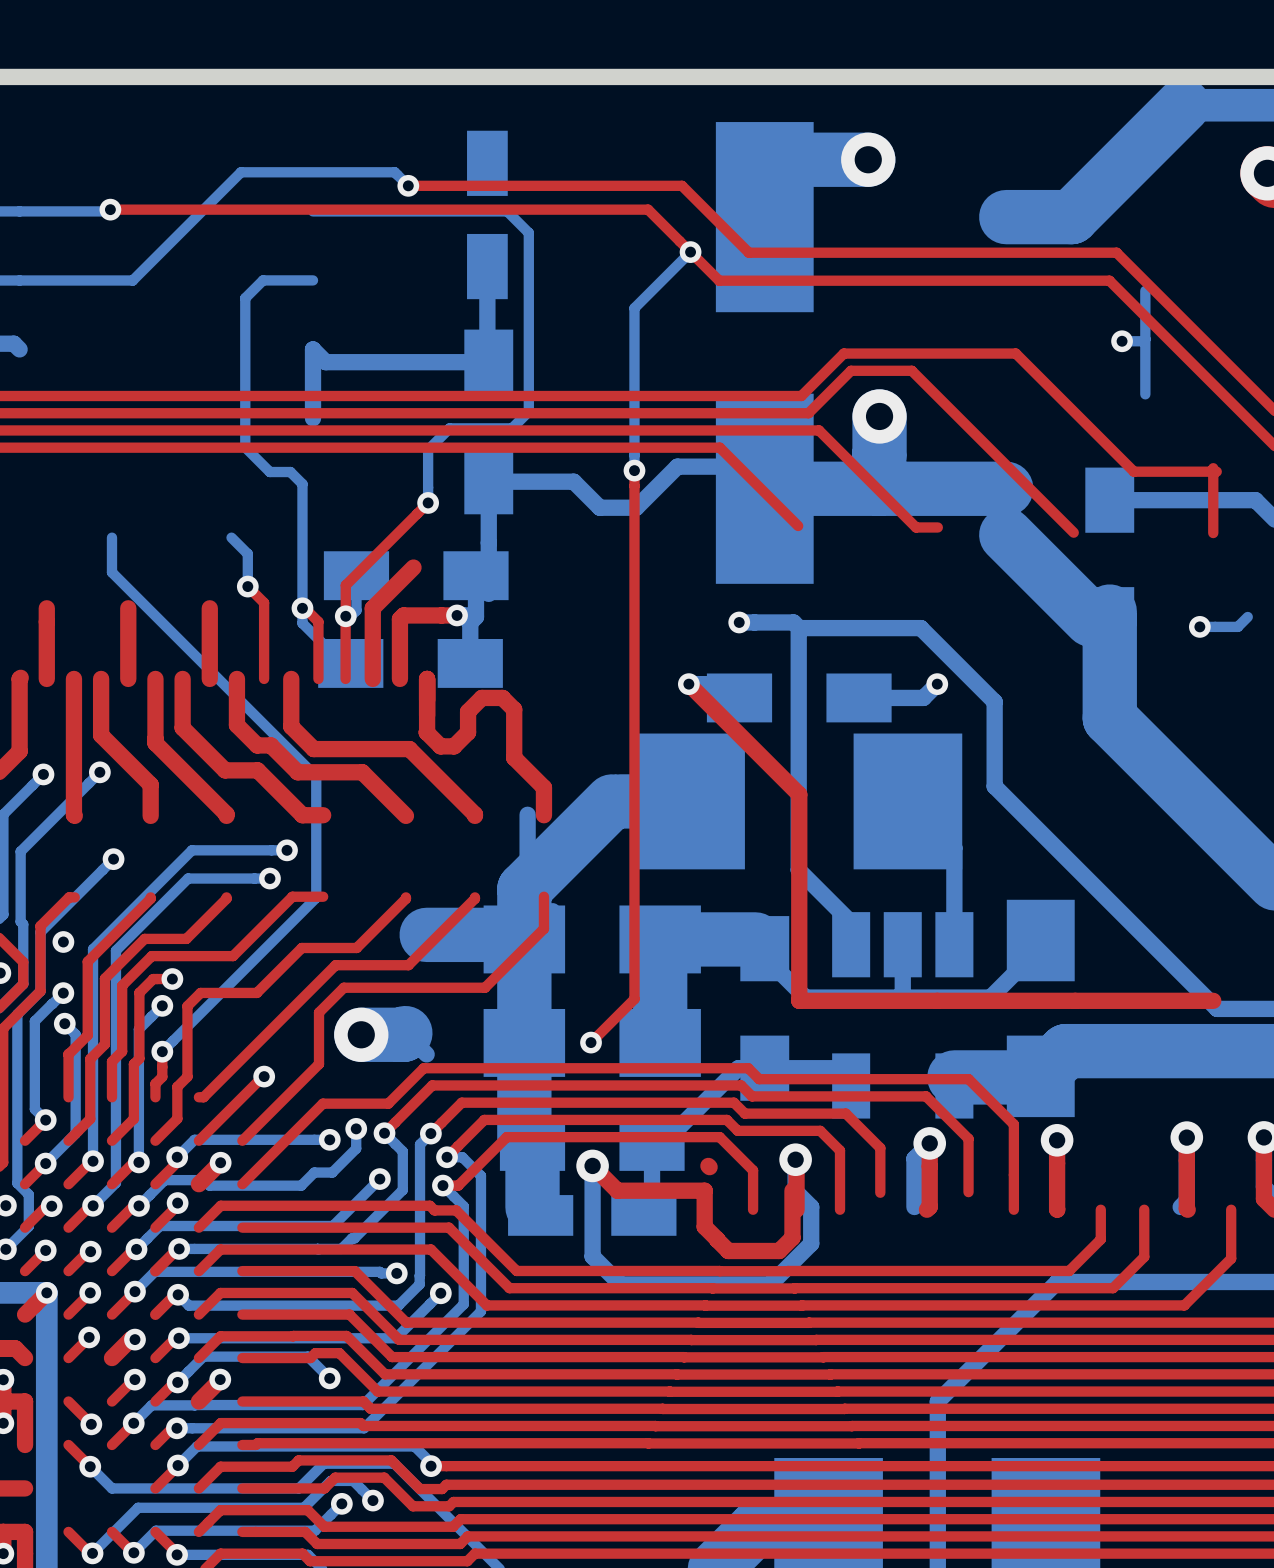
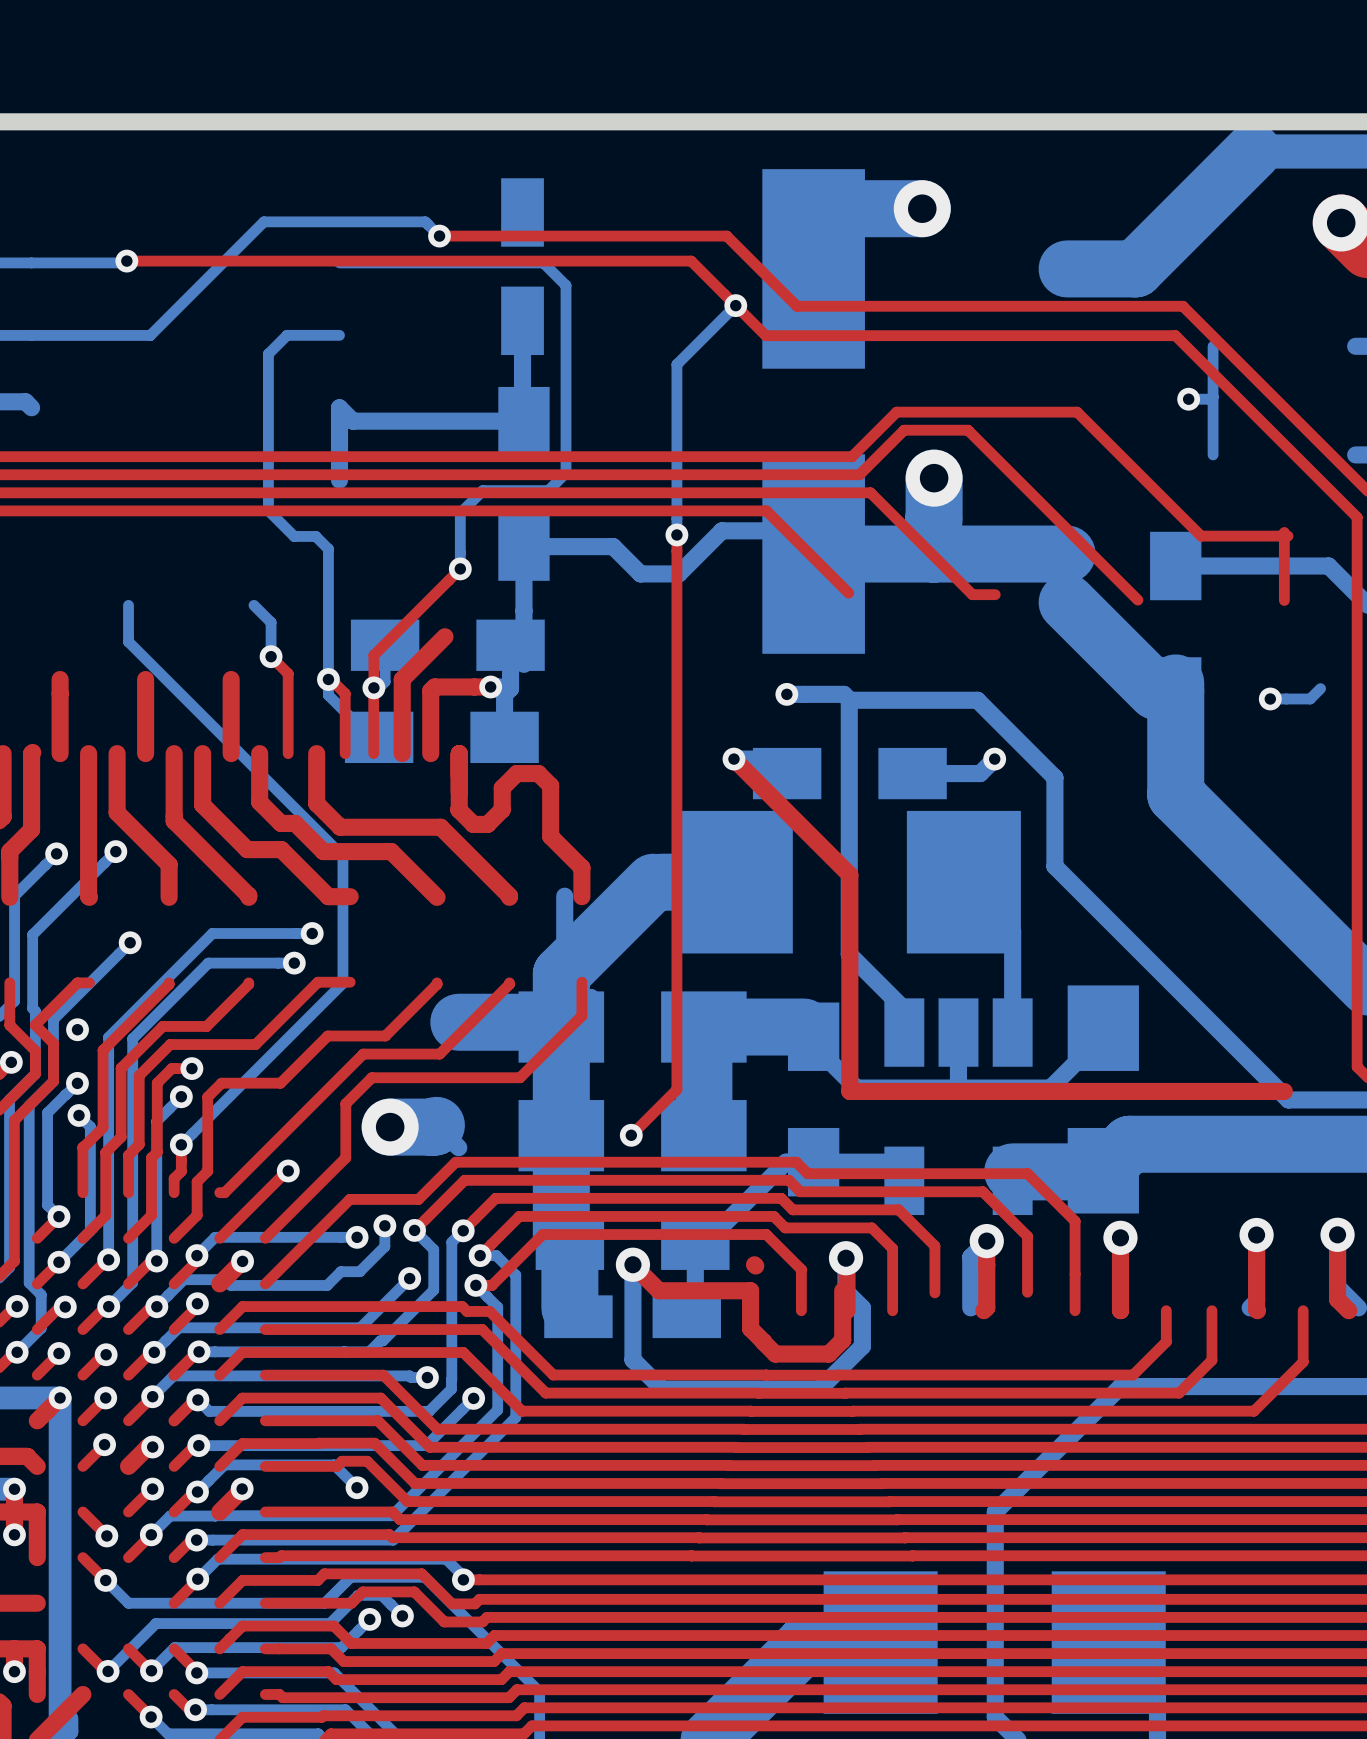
top track: (69, 897) (40, 926) (40, 954) -> (83, 982) (77, 982) (35, 1025) (53, 1043)

